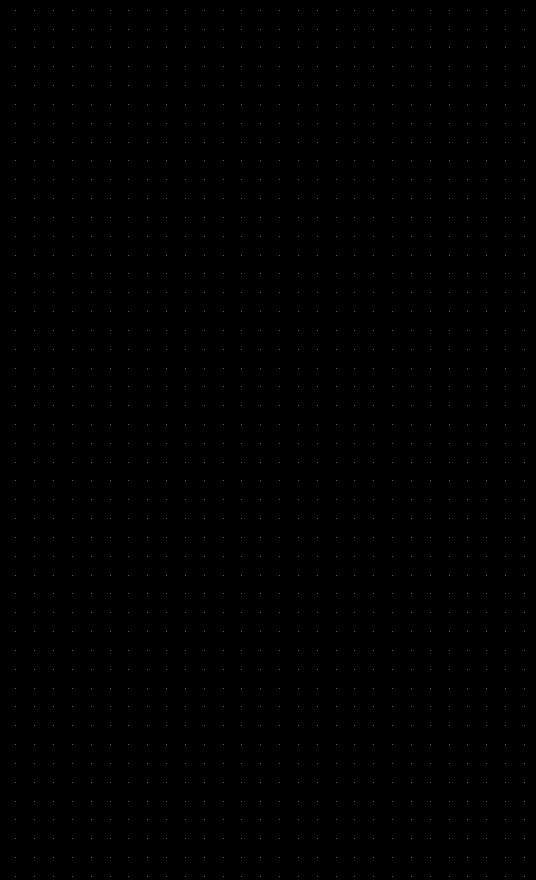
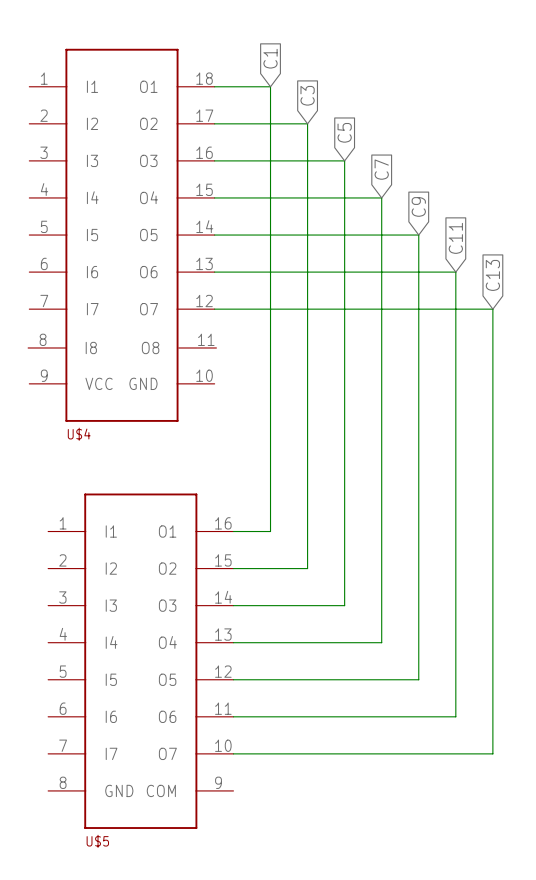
global label: none -> C1 (270, 58)
wire: none -> (214, 86) (270, 86) (270, 531) (233, 531)
global label: none -> C3 (307, 95)
wire: none -> (214, 123) (307, 123) (307, 568) (233, 568)
global label: none -> C5 (344, 132)
wire: none -> (214, 160) (344, 160) (344, 605) (233, 605)
global label: none -> C7 (381, 169)
wire: none -> (214, 197) (381, 197) (381, 642) (233, 642)
global label: none -> C9 (418, 206)
U$4: none -> (122, 235)
wire: none -> (214, 235) (418, 235) (418, 679) (233, 679)
global label: none -> C11 (455, 238)
wire: none -> (214, 272) (455, 272) (455, 716) (233, 716)
global label: none -> C13 (492, 275)
wire: none -> (214, 309) (492, 309) (492, 753) (233, 753)
U$5: none -> (140, 661)

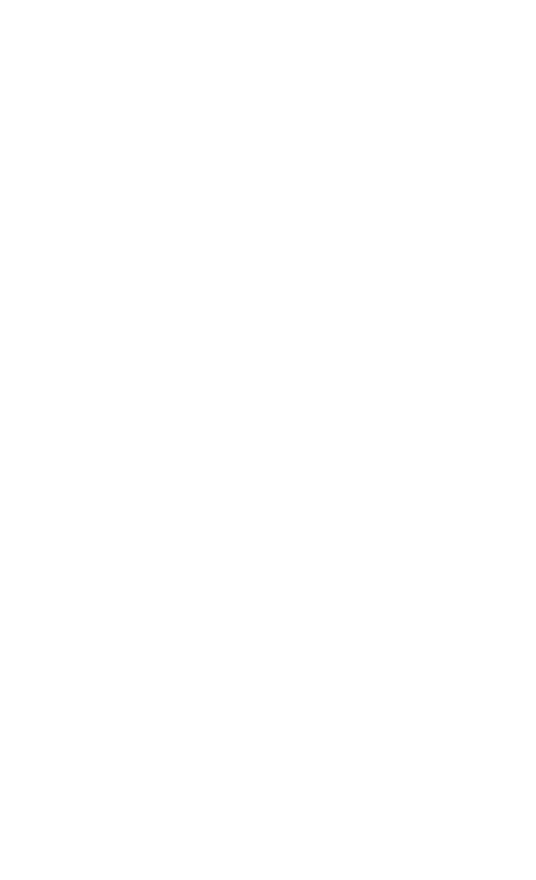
global label: C1 (270, 58) -> none
wire: (214, 86) (270, 86) (270, 531) (233, 531) -> none
global label: C3 (307, 95) -> none
wire: (214, 123) (307, 123) (307, 568) (233, 568) -> none
global label: C5 (344, 132) -> none
wire: (214, 160) (344, 160) (344, 605) (233, 605) -> none
global label: C7 (381, 169) -> none
wire: (214, 197) (381, 197) (381, 642) (233, 642) -> none
global label: C9 (418, 206) -> none
U$4: (122, 235) -> none
wire: (214, 235) (418, 235) (418, 679) (233, 679) -> none
global label: C11 (455, 238) -> none
wire: (214, 272) (455, 272) (455, 716) (233, 716) -> none
global label: C13 (492, 275) -> none
wire: (214, 309) (492, 309) (492, 753) (233, 753) -> none
U$5: (140, 661) -> none

